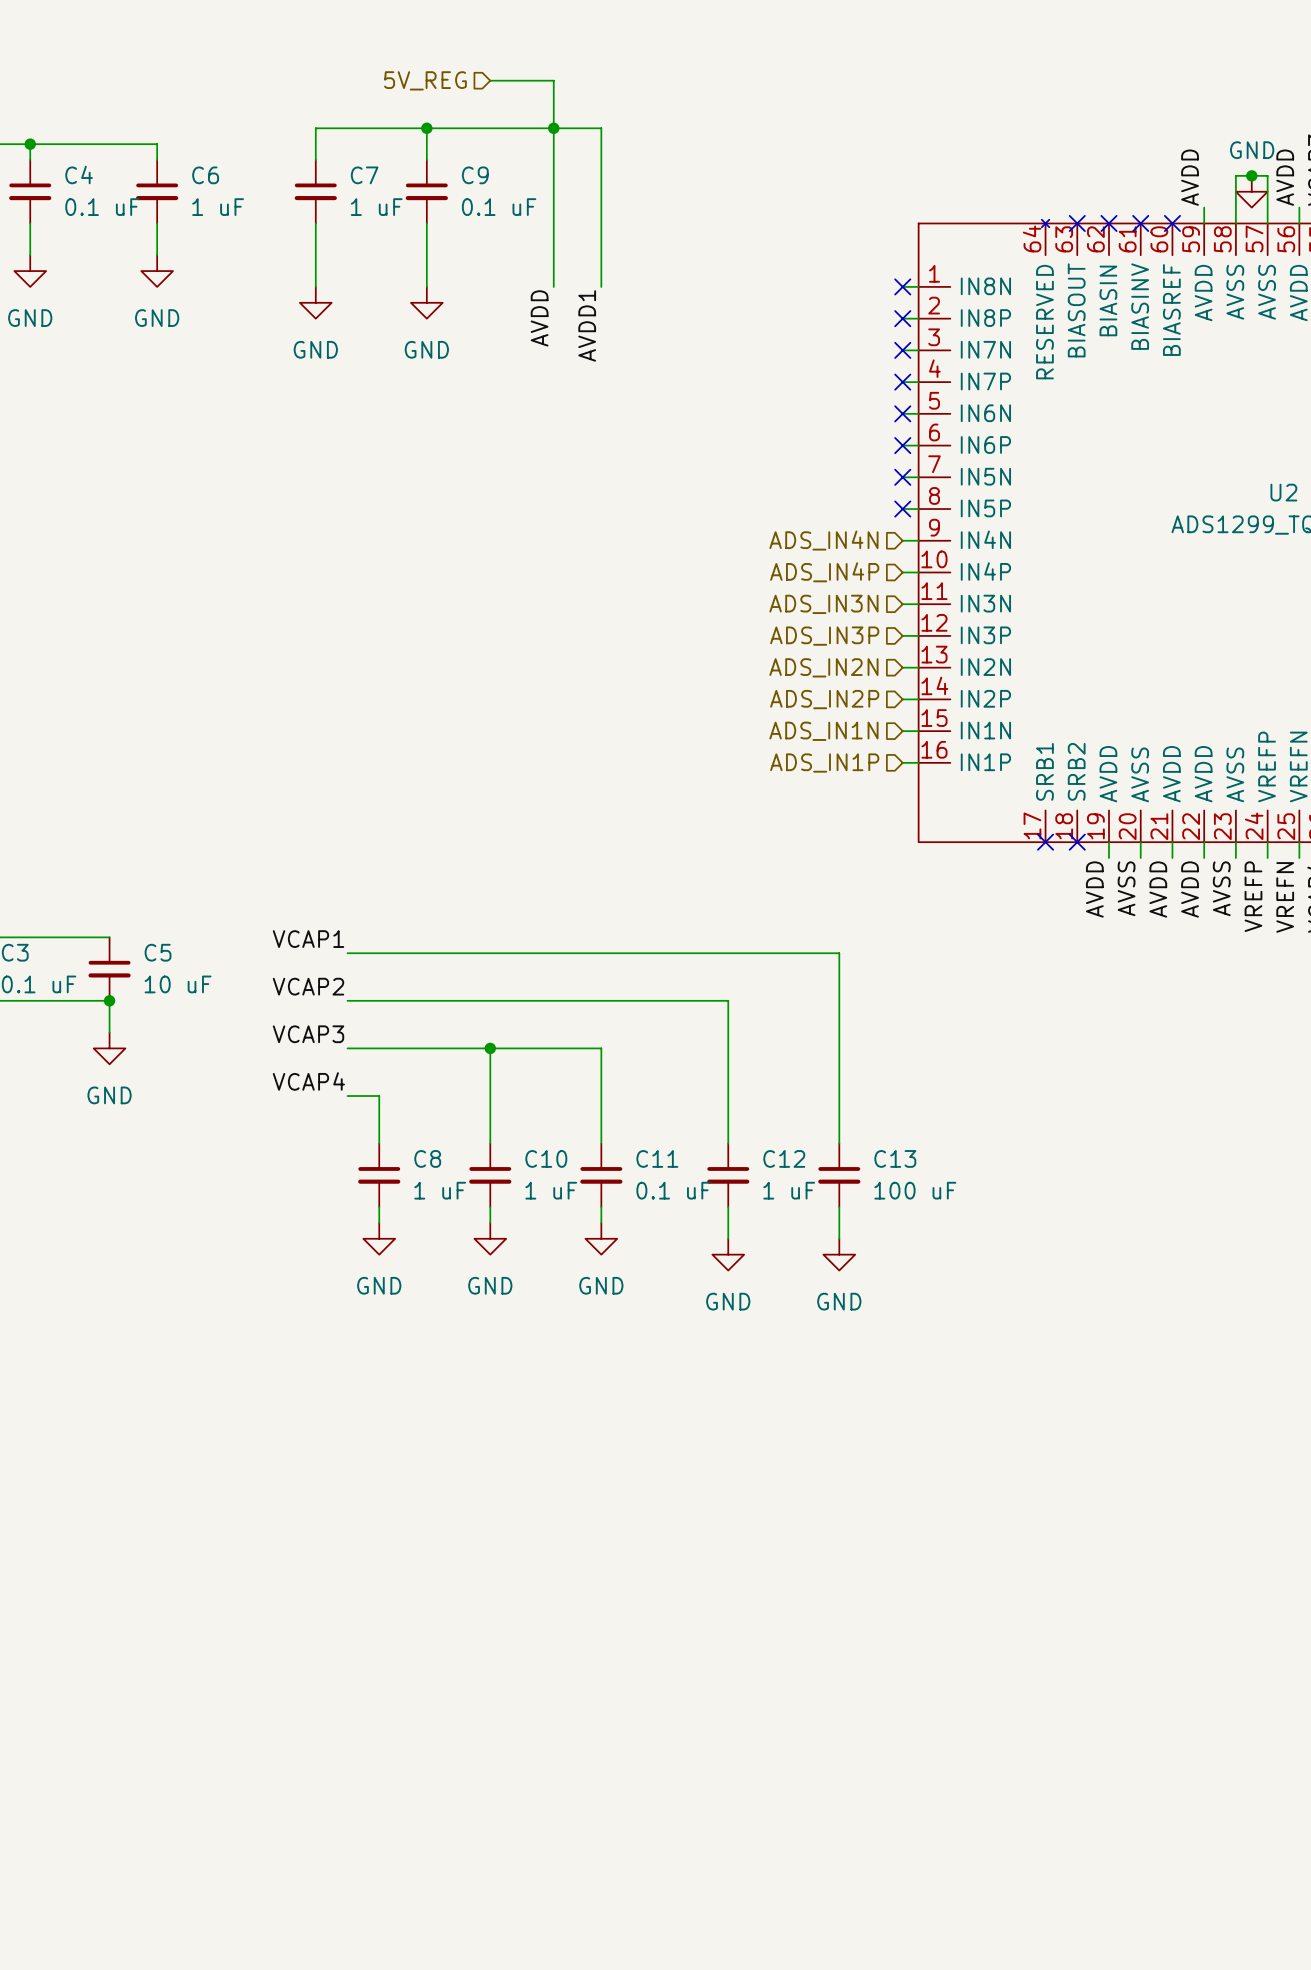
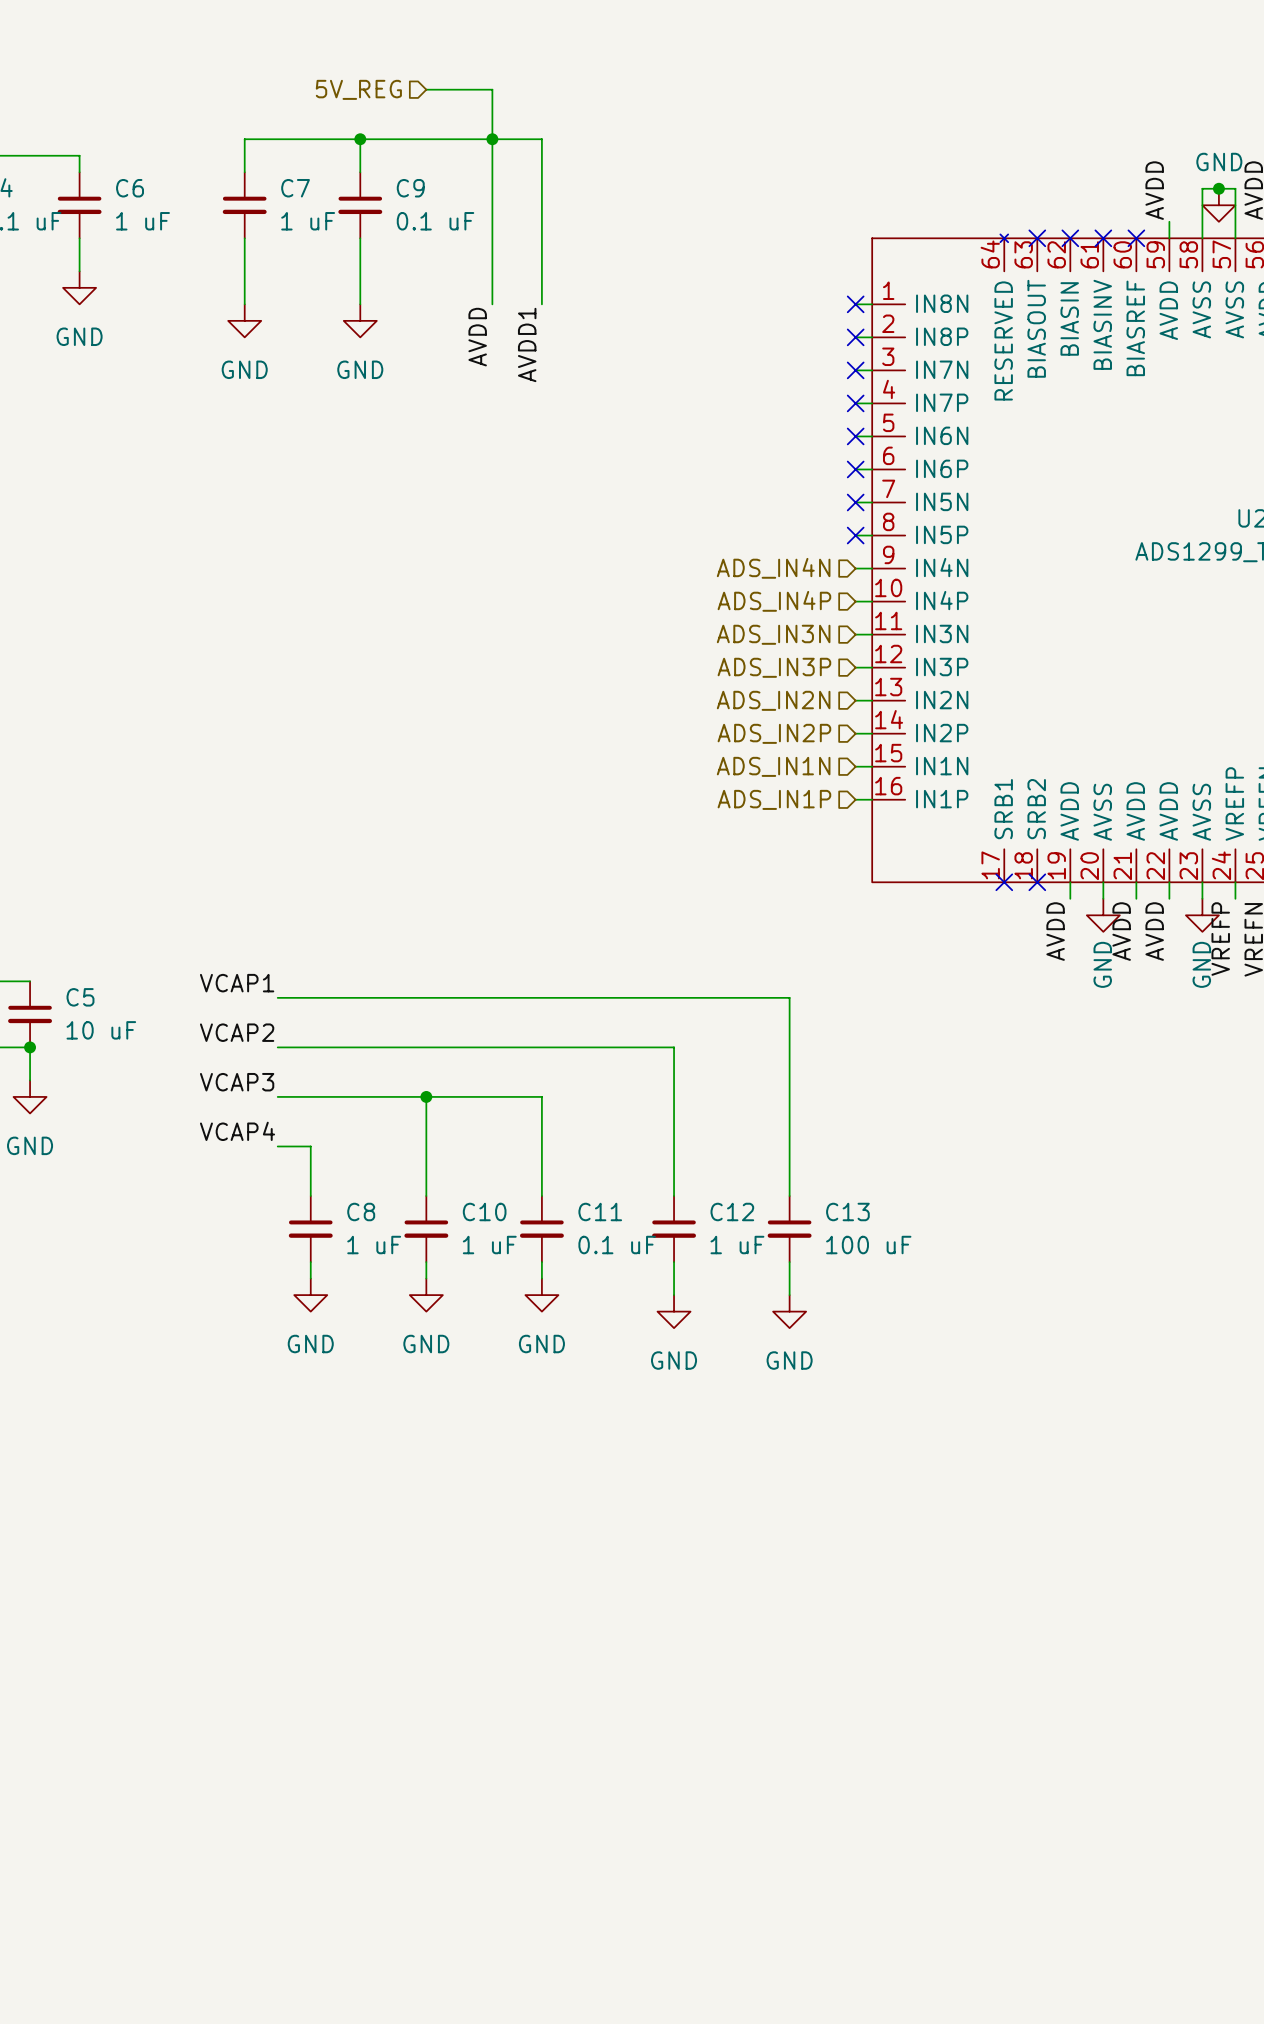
power symbol: none -> GND (1103, 915)
power symbol: none -> GND (1202, 915)
label: AVSS (1126, 888) -> none
label: AVSS (1221, 888) -> none

